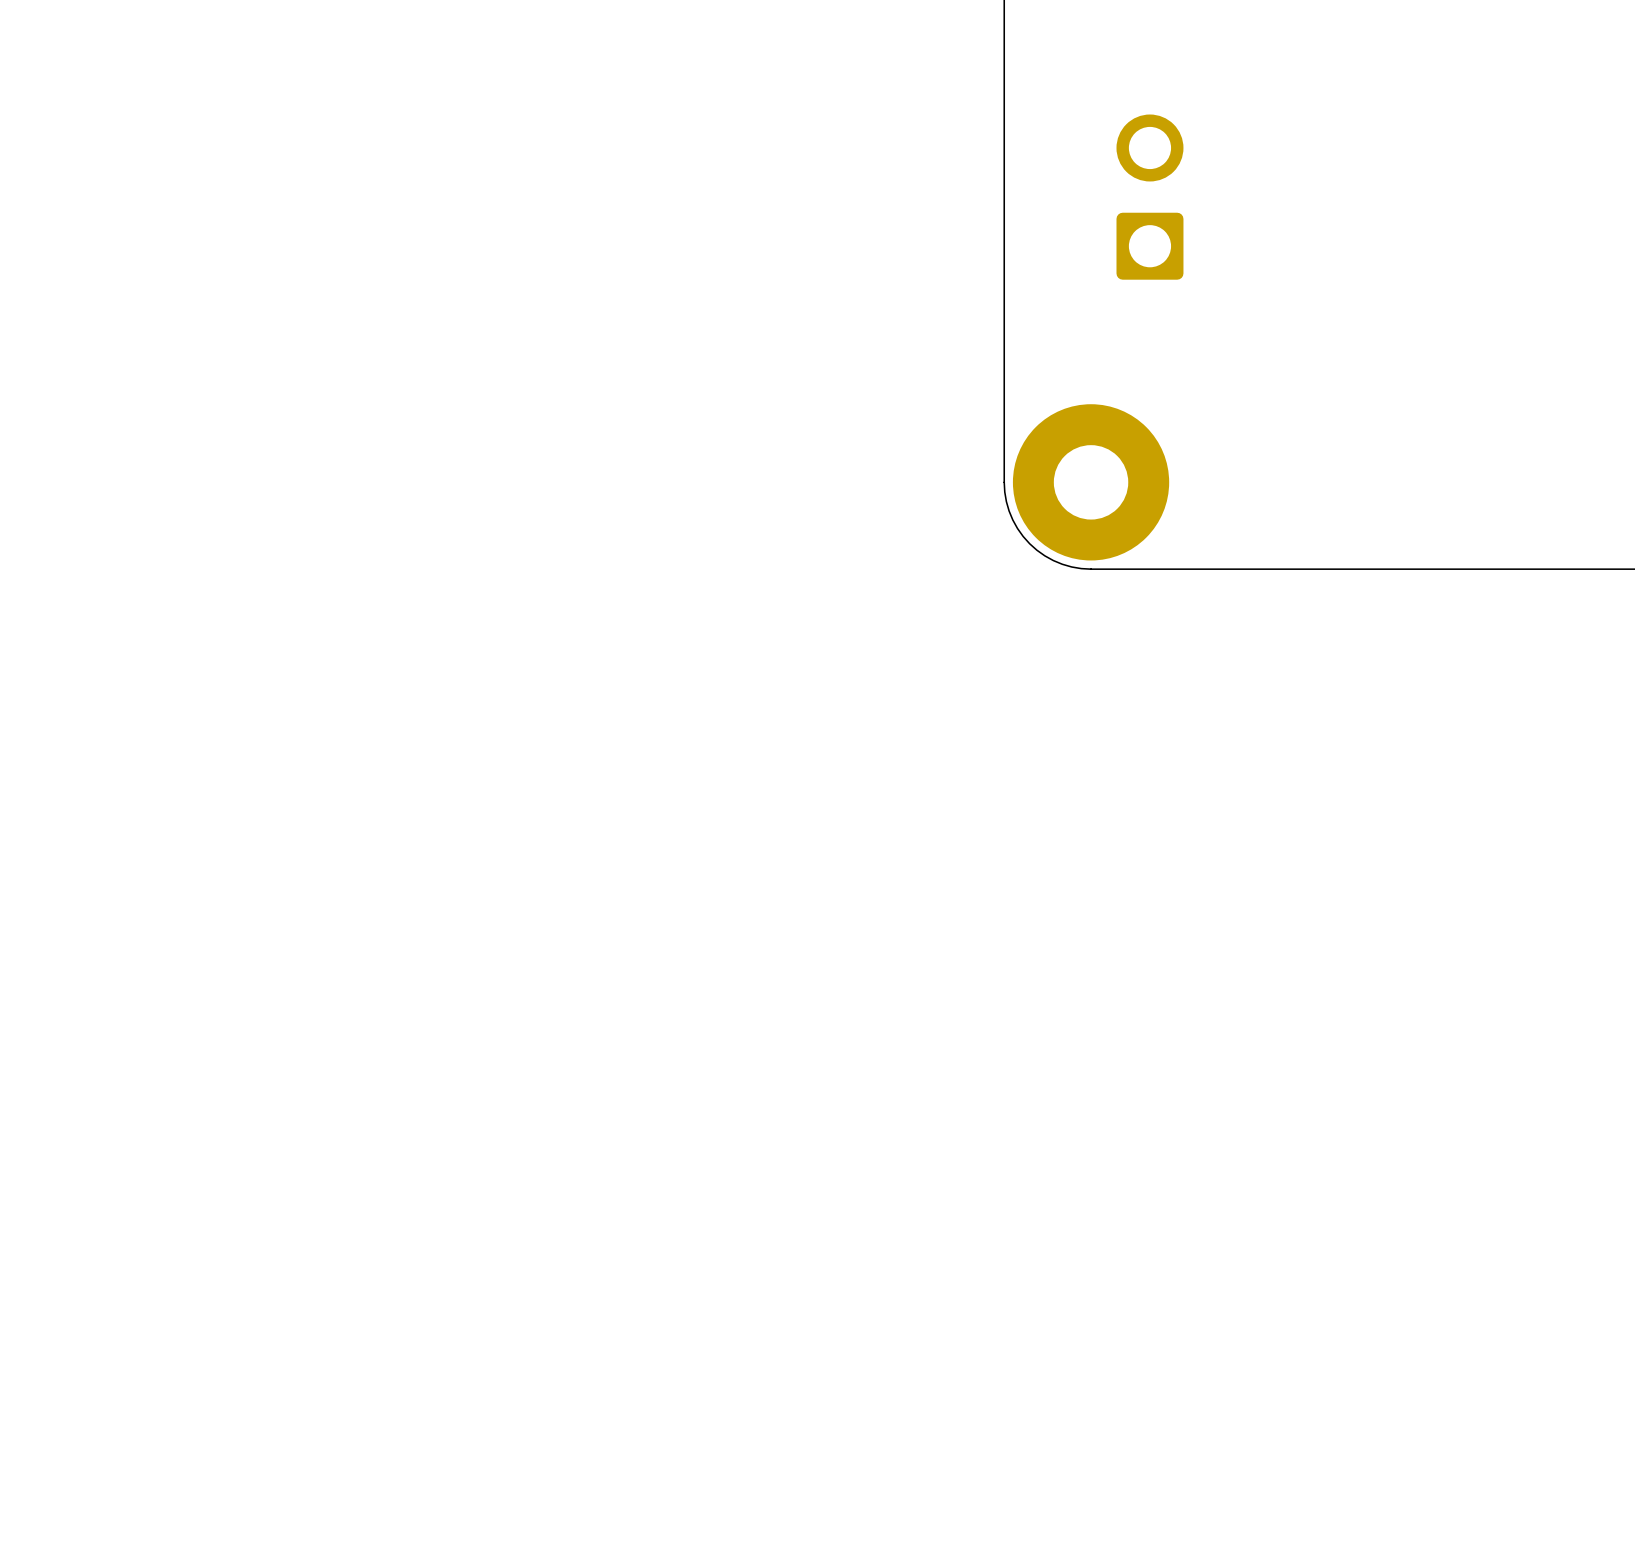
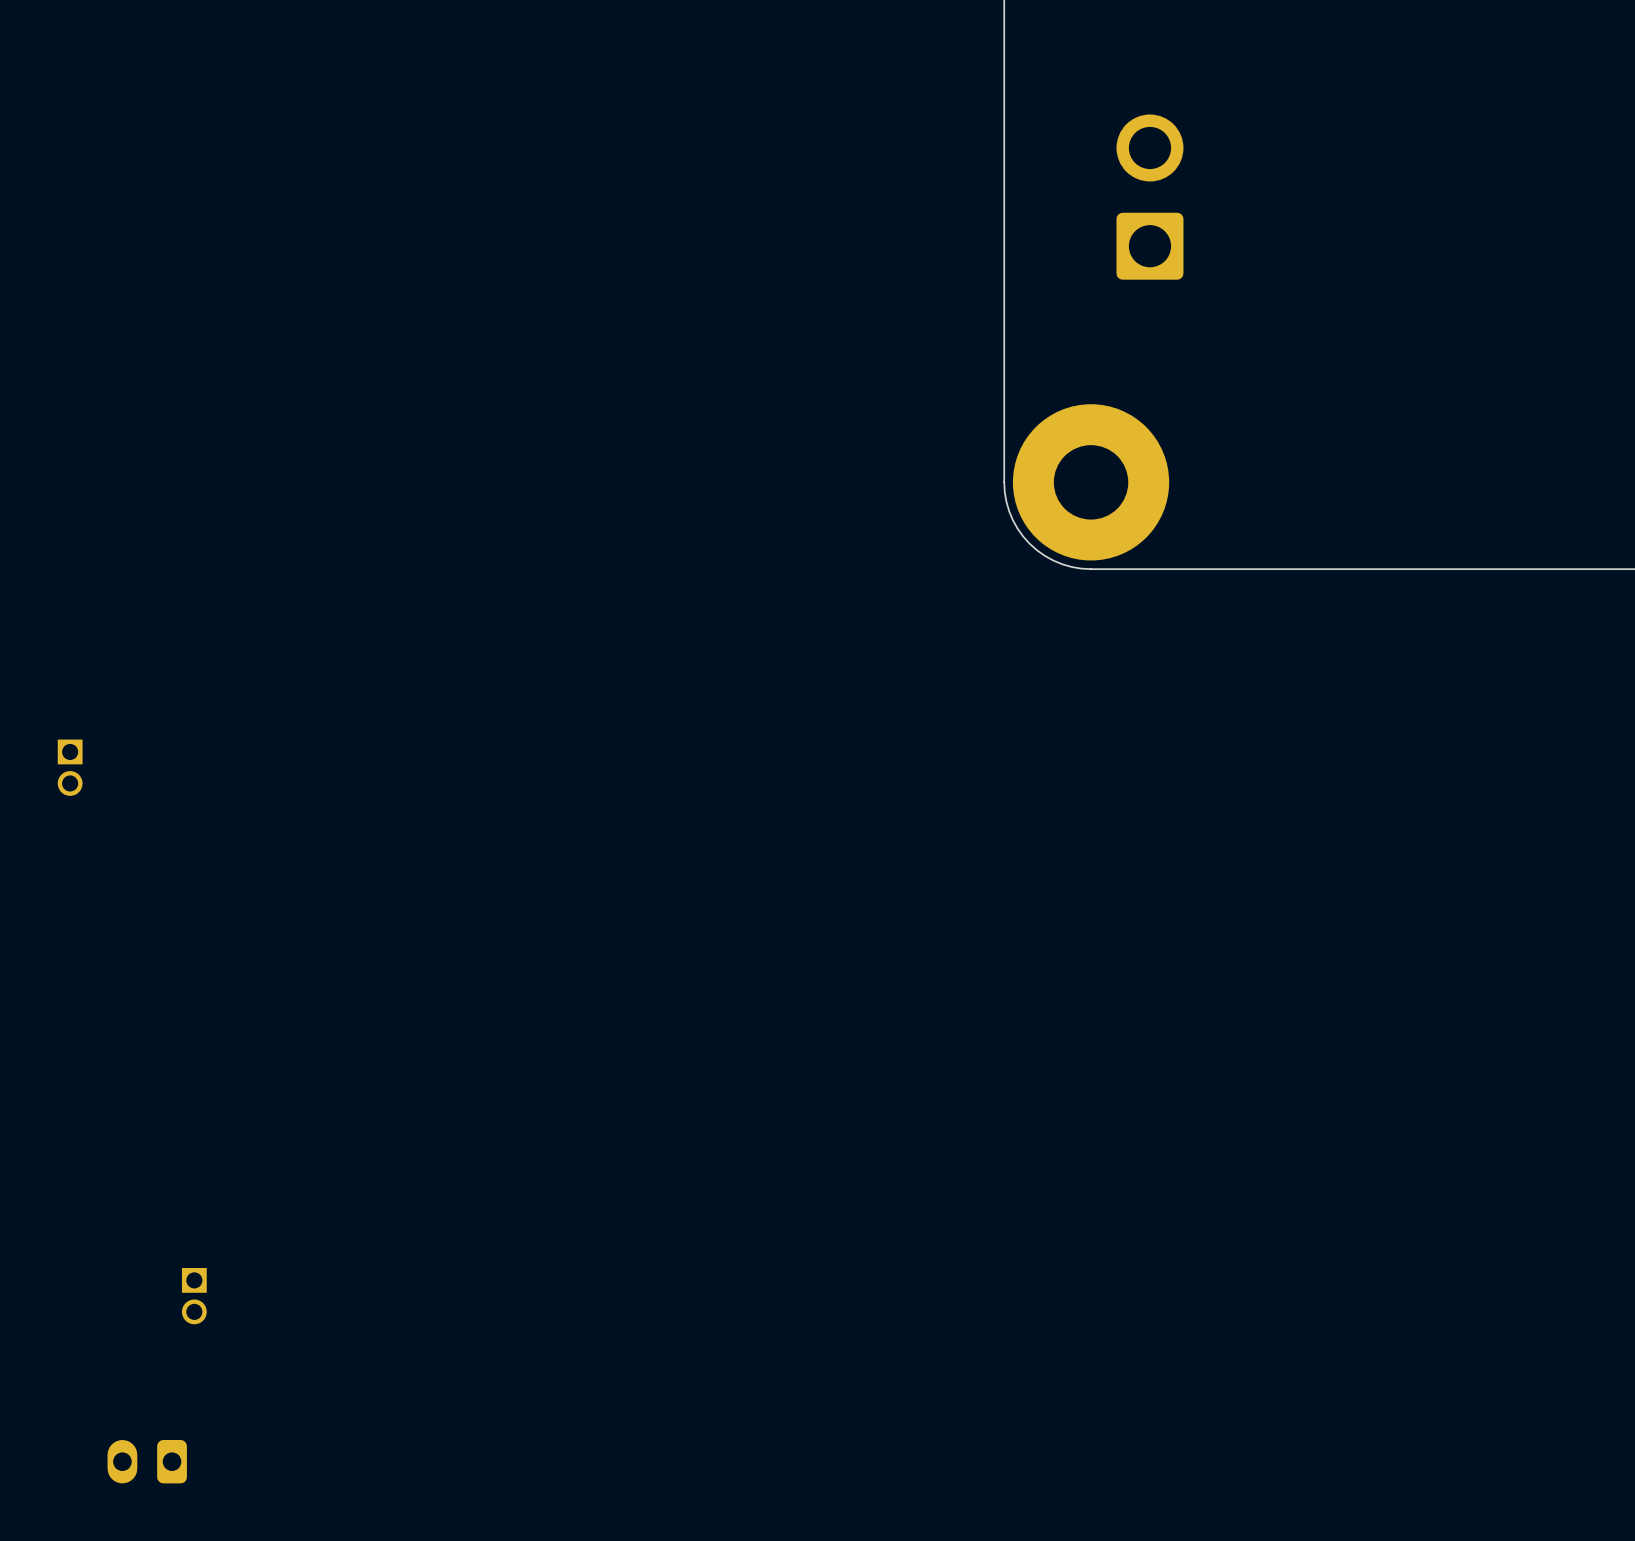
part: none -> (70, 767)
part: none -> (194, 1296)
part: none -> (147, 1461)

